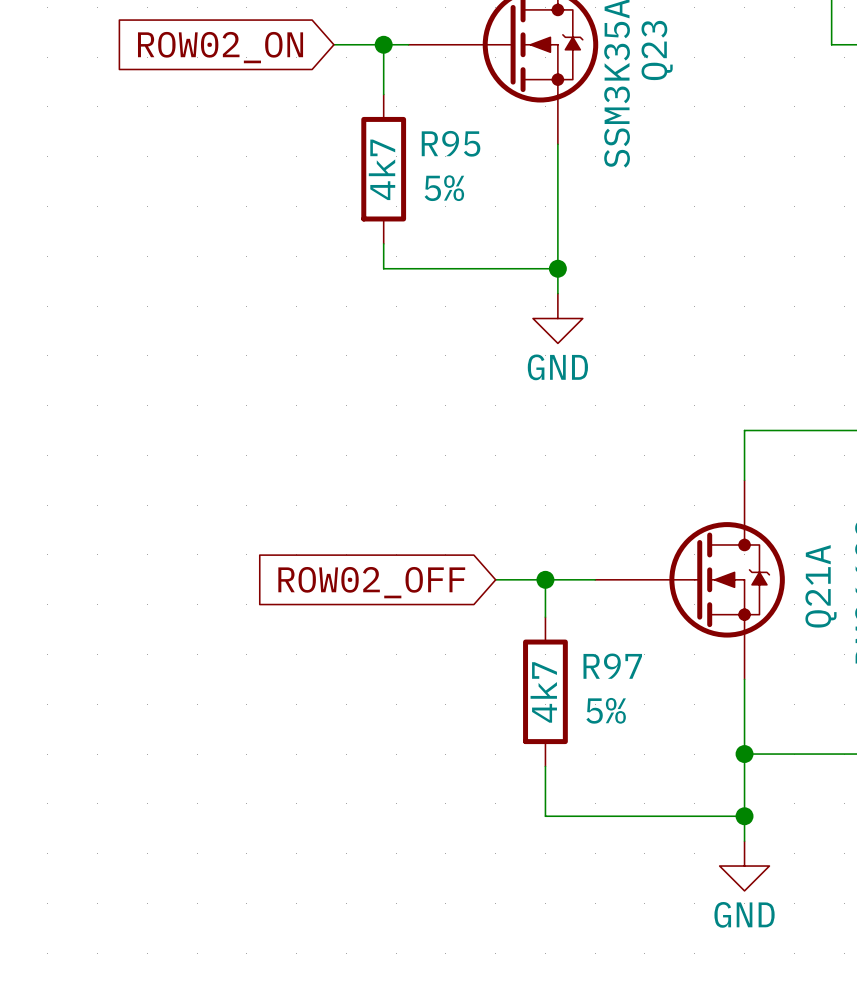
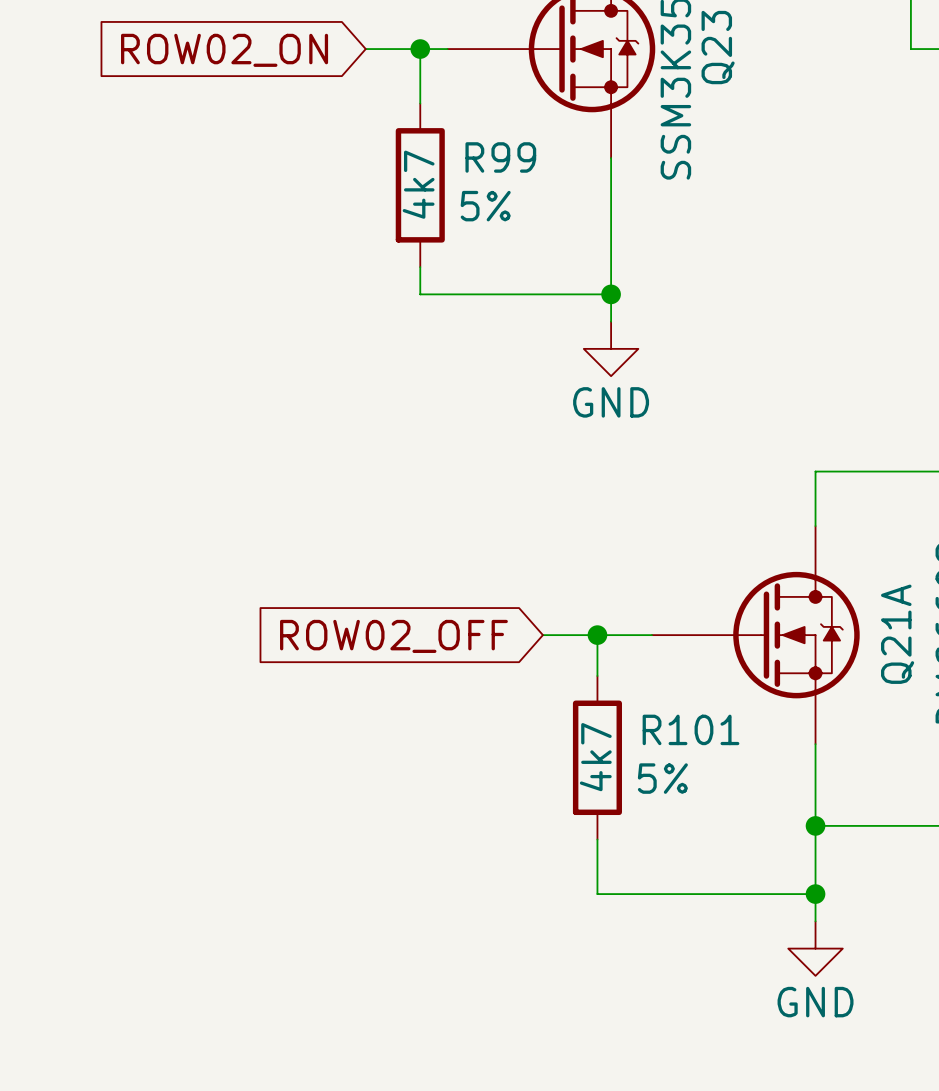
R95 name: R95 (451, 143) -> R99 (500, 157)
R97 name: R97 (612, 666) -> R101 (690, 729)

